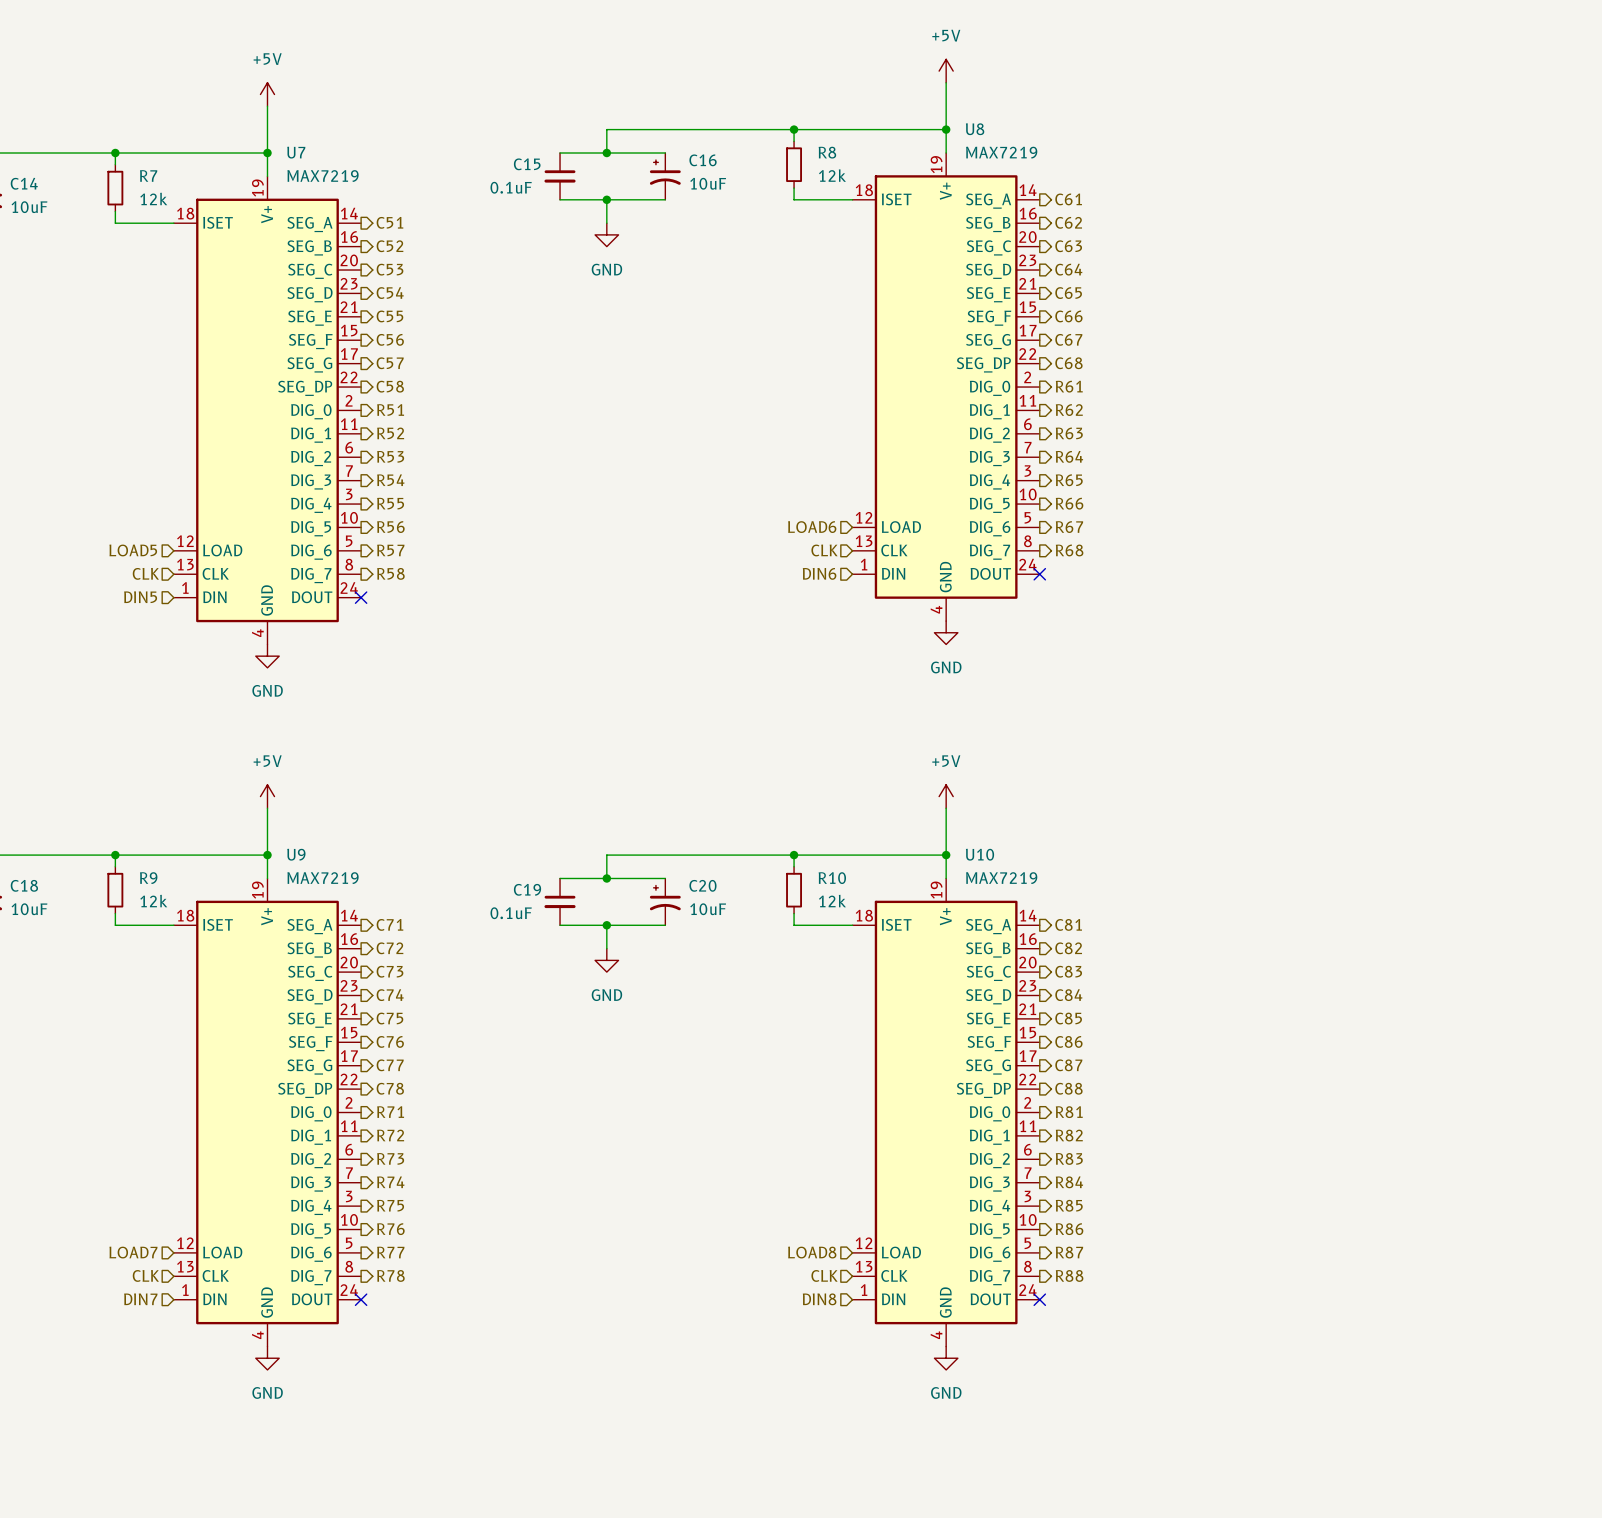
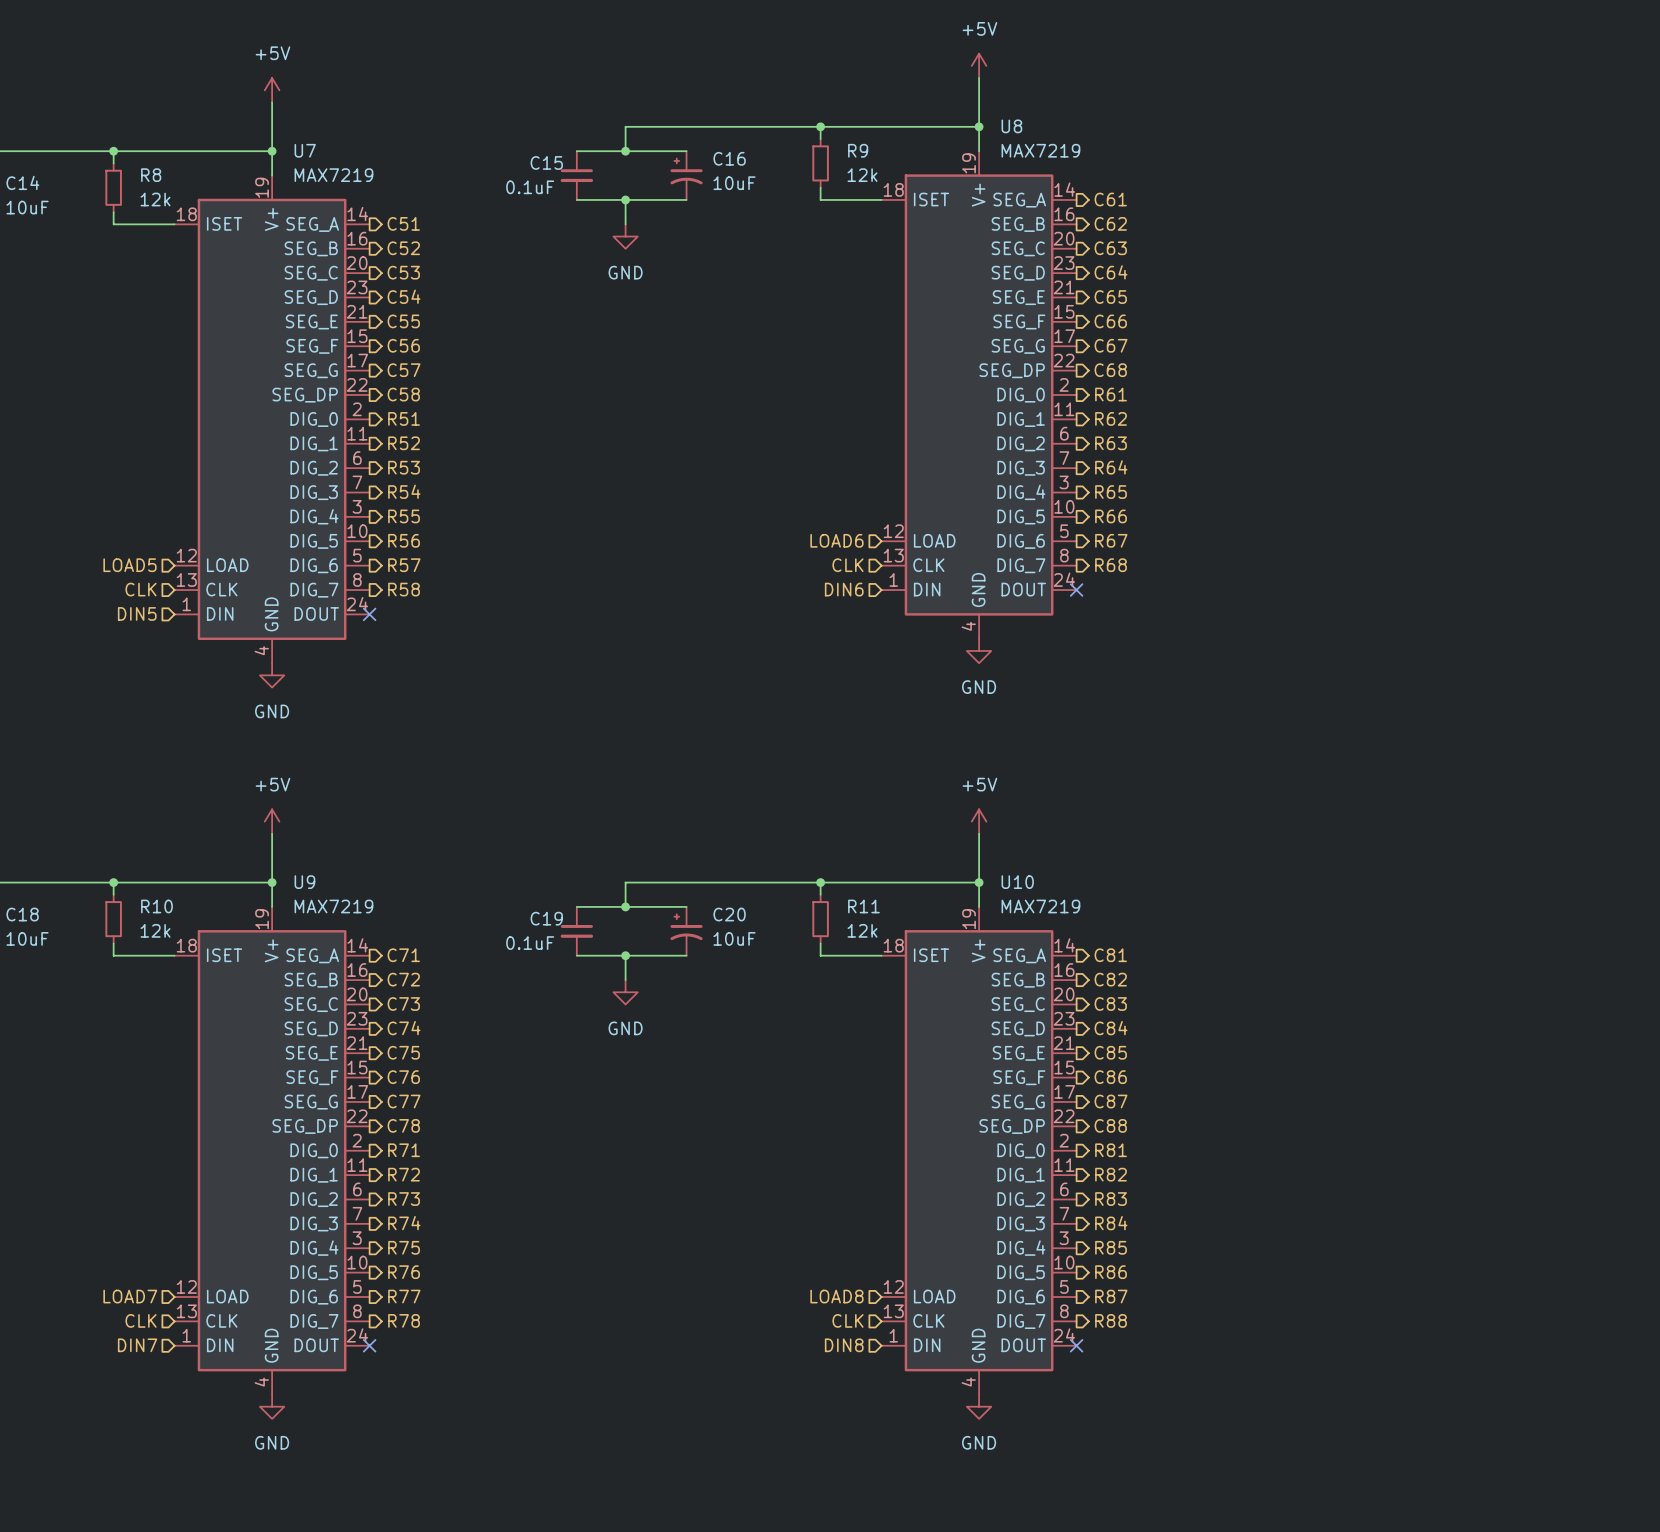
R8 name: R8 (827, 152) -> R9 (858, 150)
R7 name: R7 (148, 175) -> R8 (151, 175)
R9 name: R9 (148, 878) -> R10 (156, 906)
R10 name: R10 (832, 878) -> R11 (863, 906)

